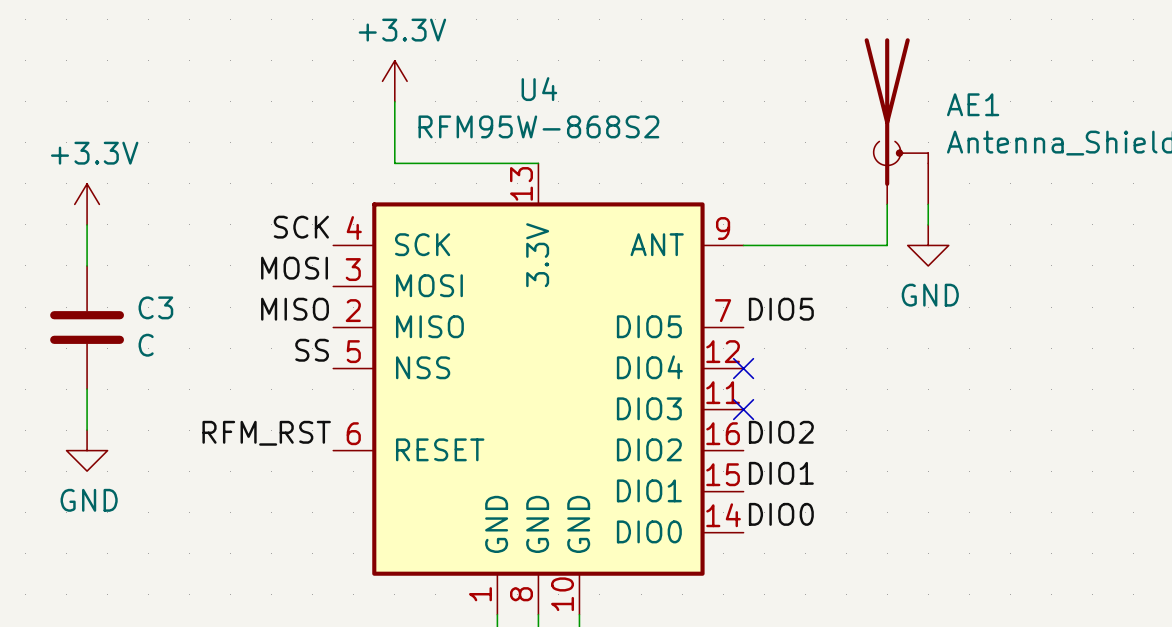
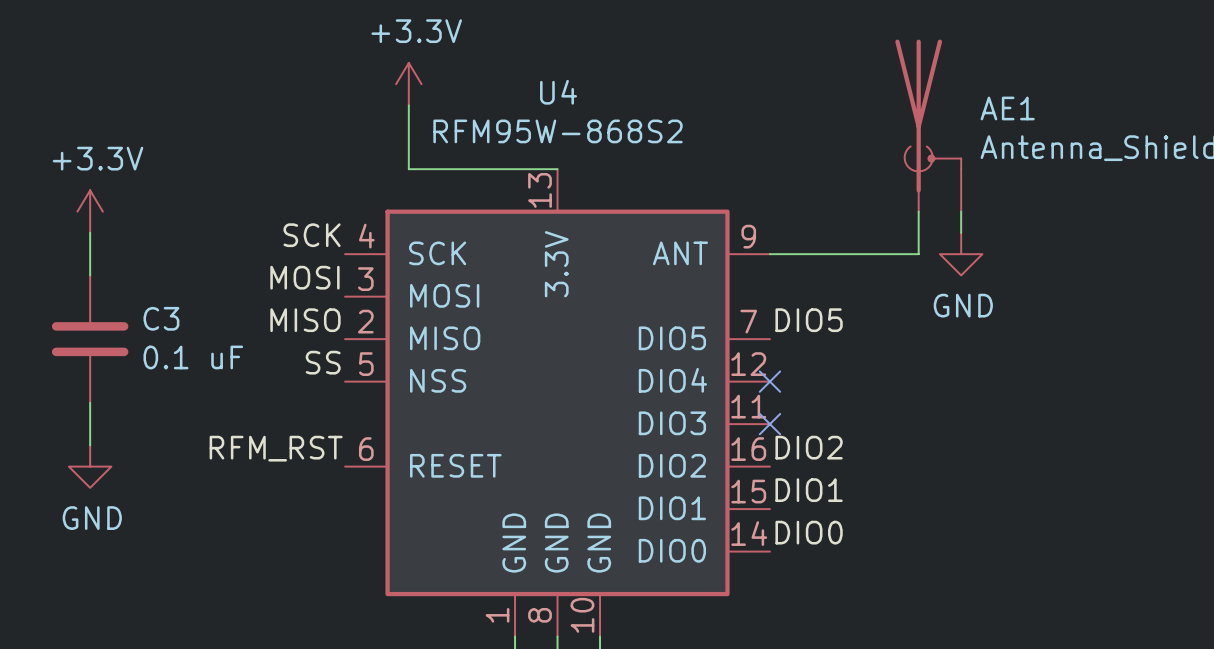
C3 value: C (146, 345) -> 0.1 uF (193, 357)

